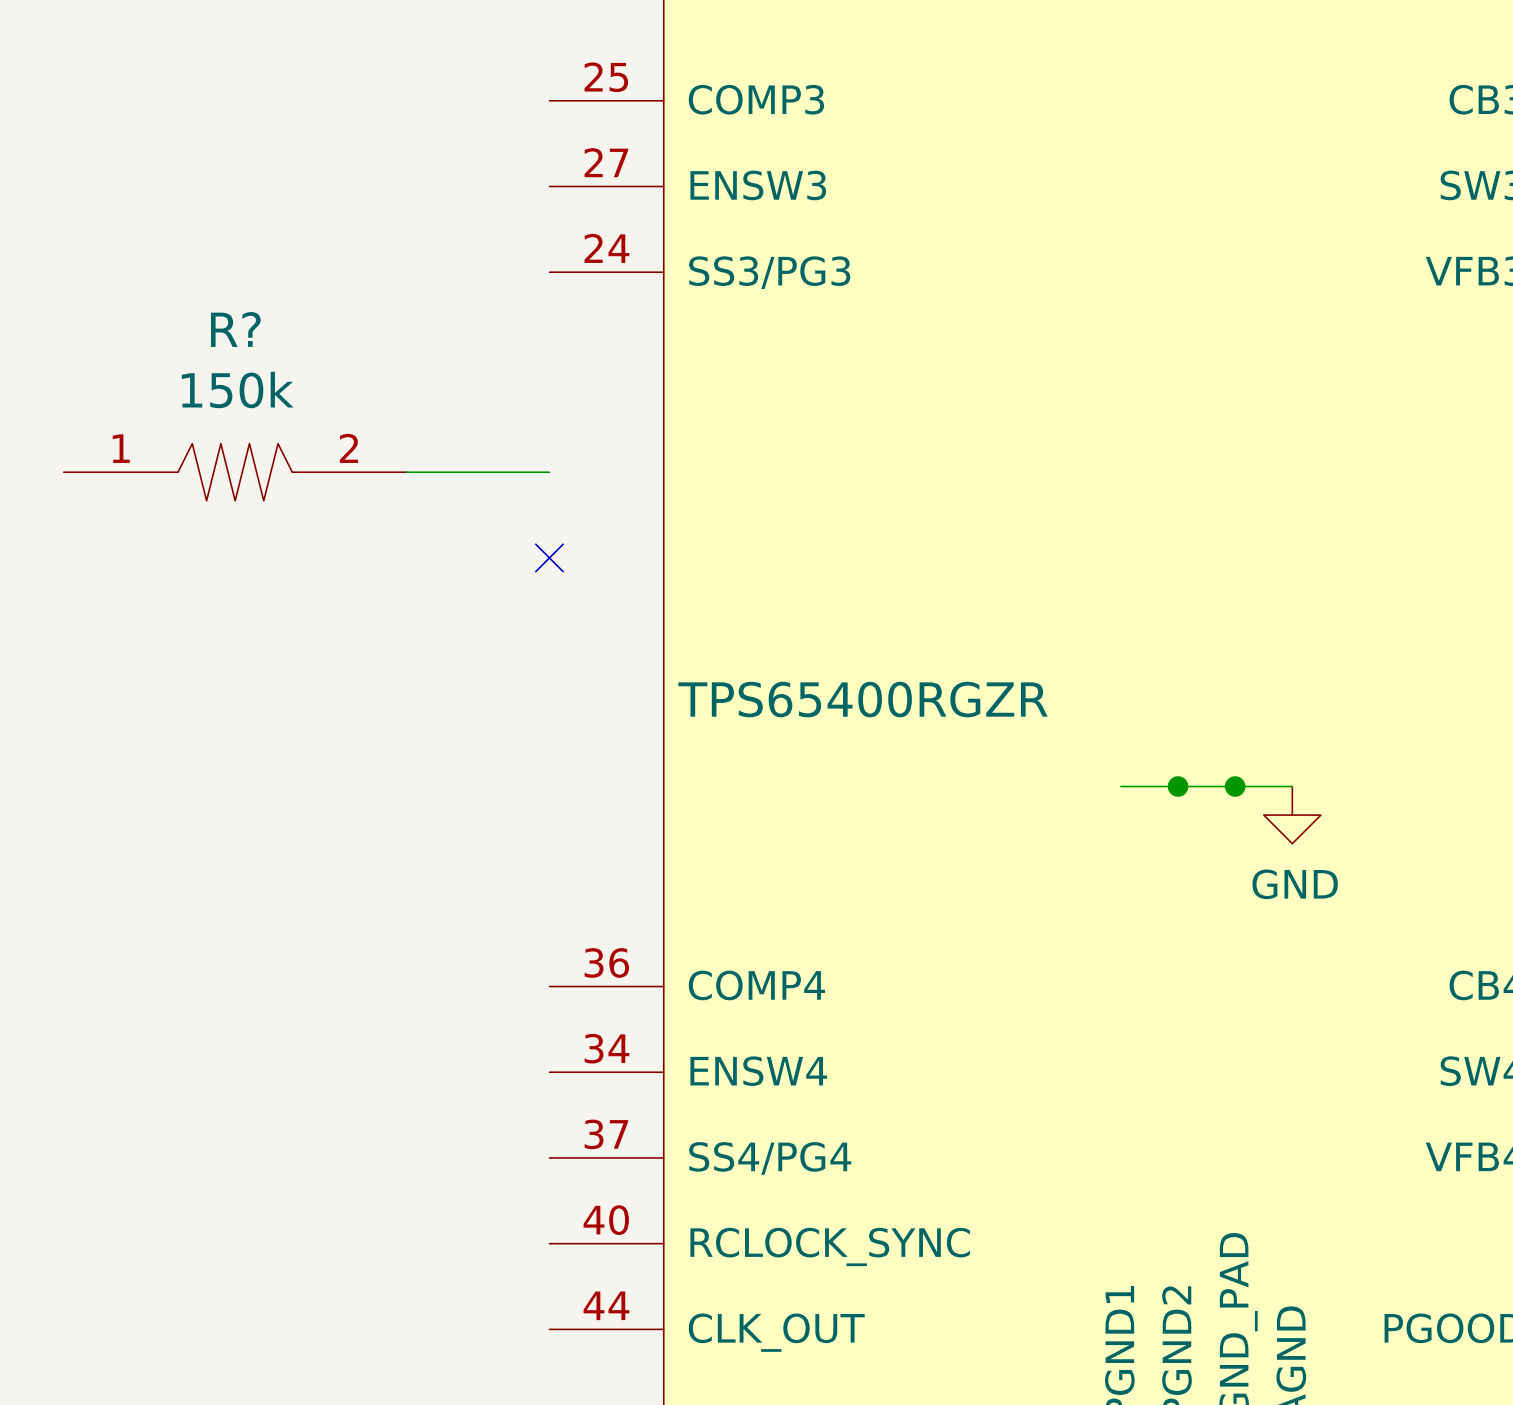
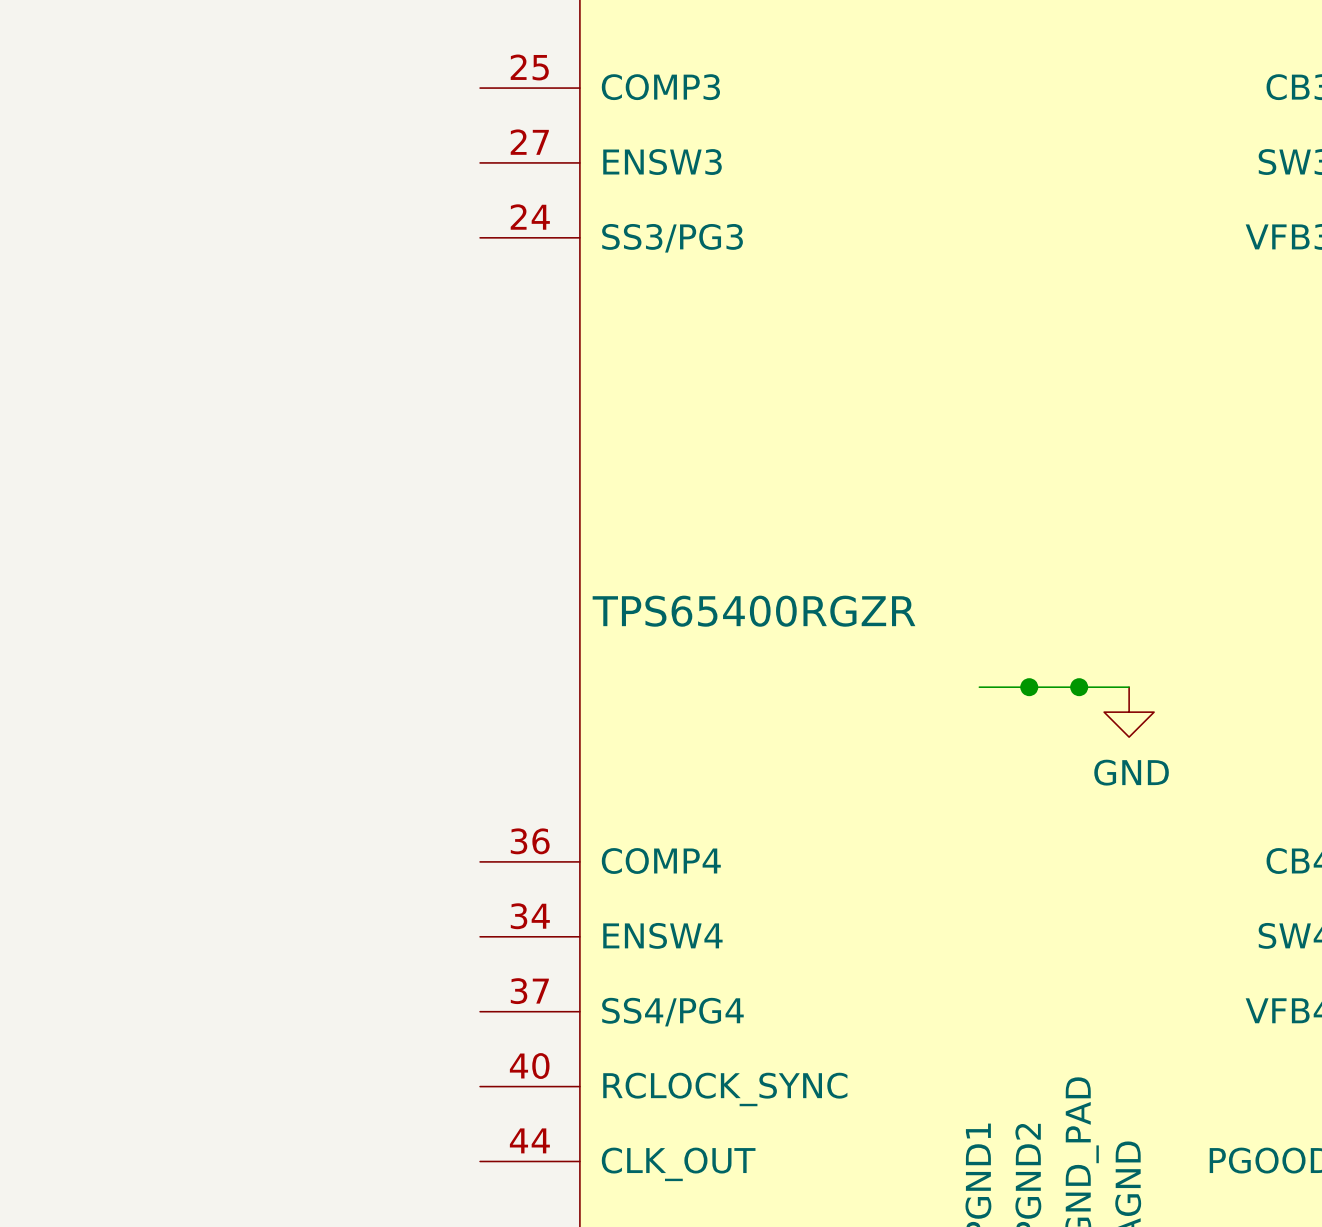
R?: (235, 472) -> none
wire: (406, 472) (549, 472) -> none
no-connect mark: (549, 557) -> none

